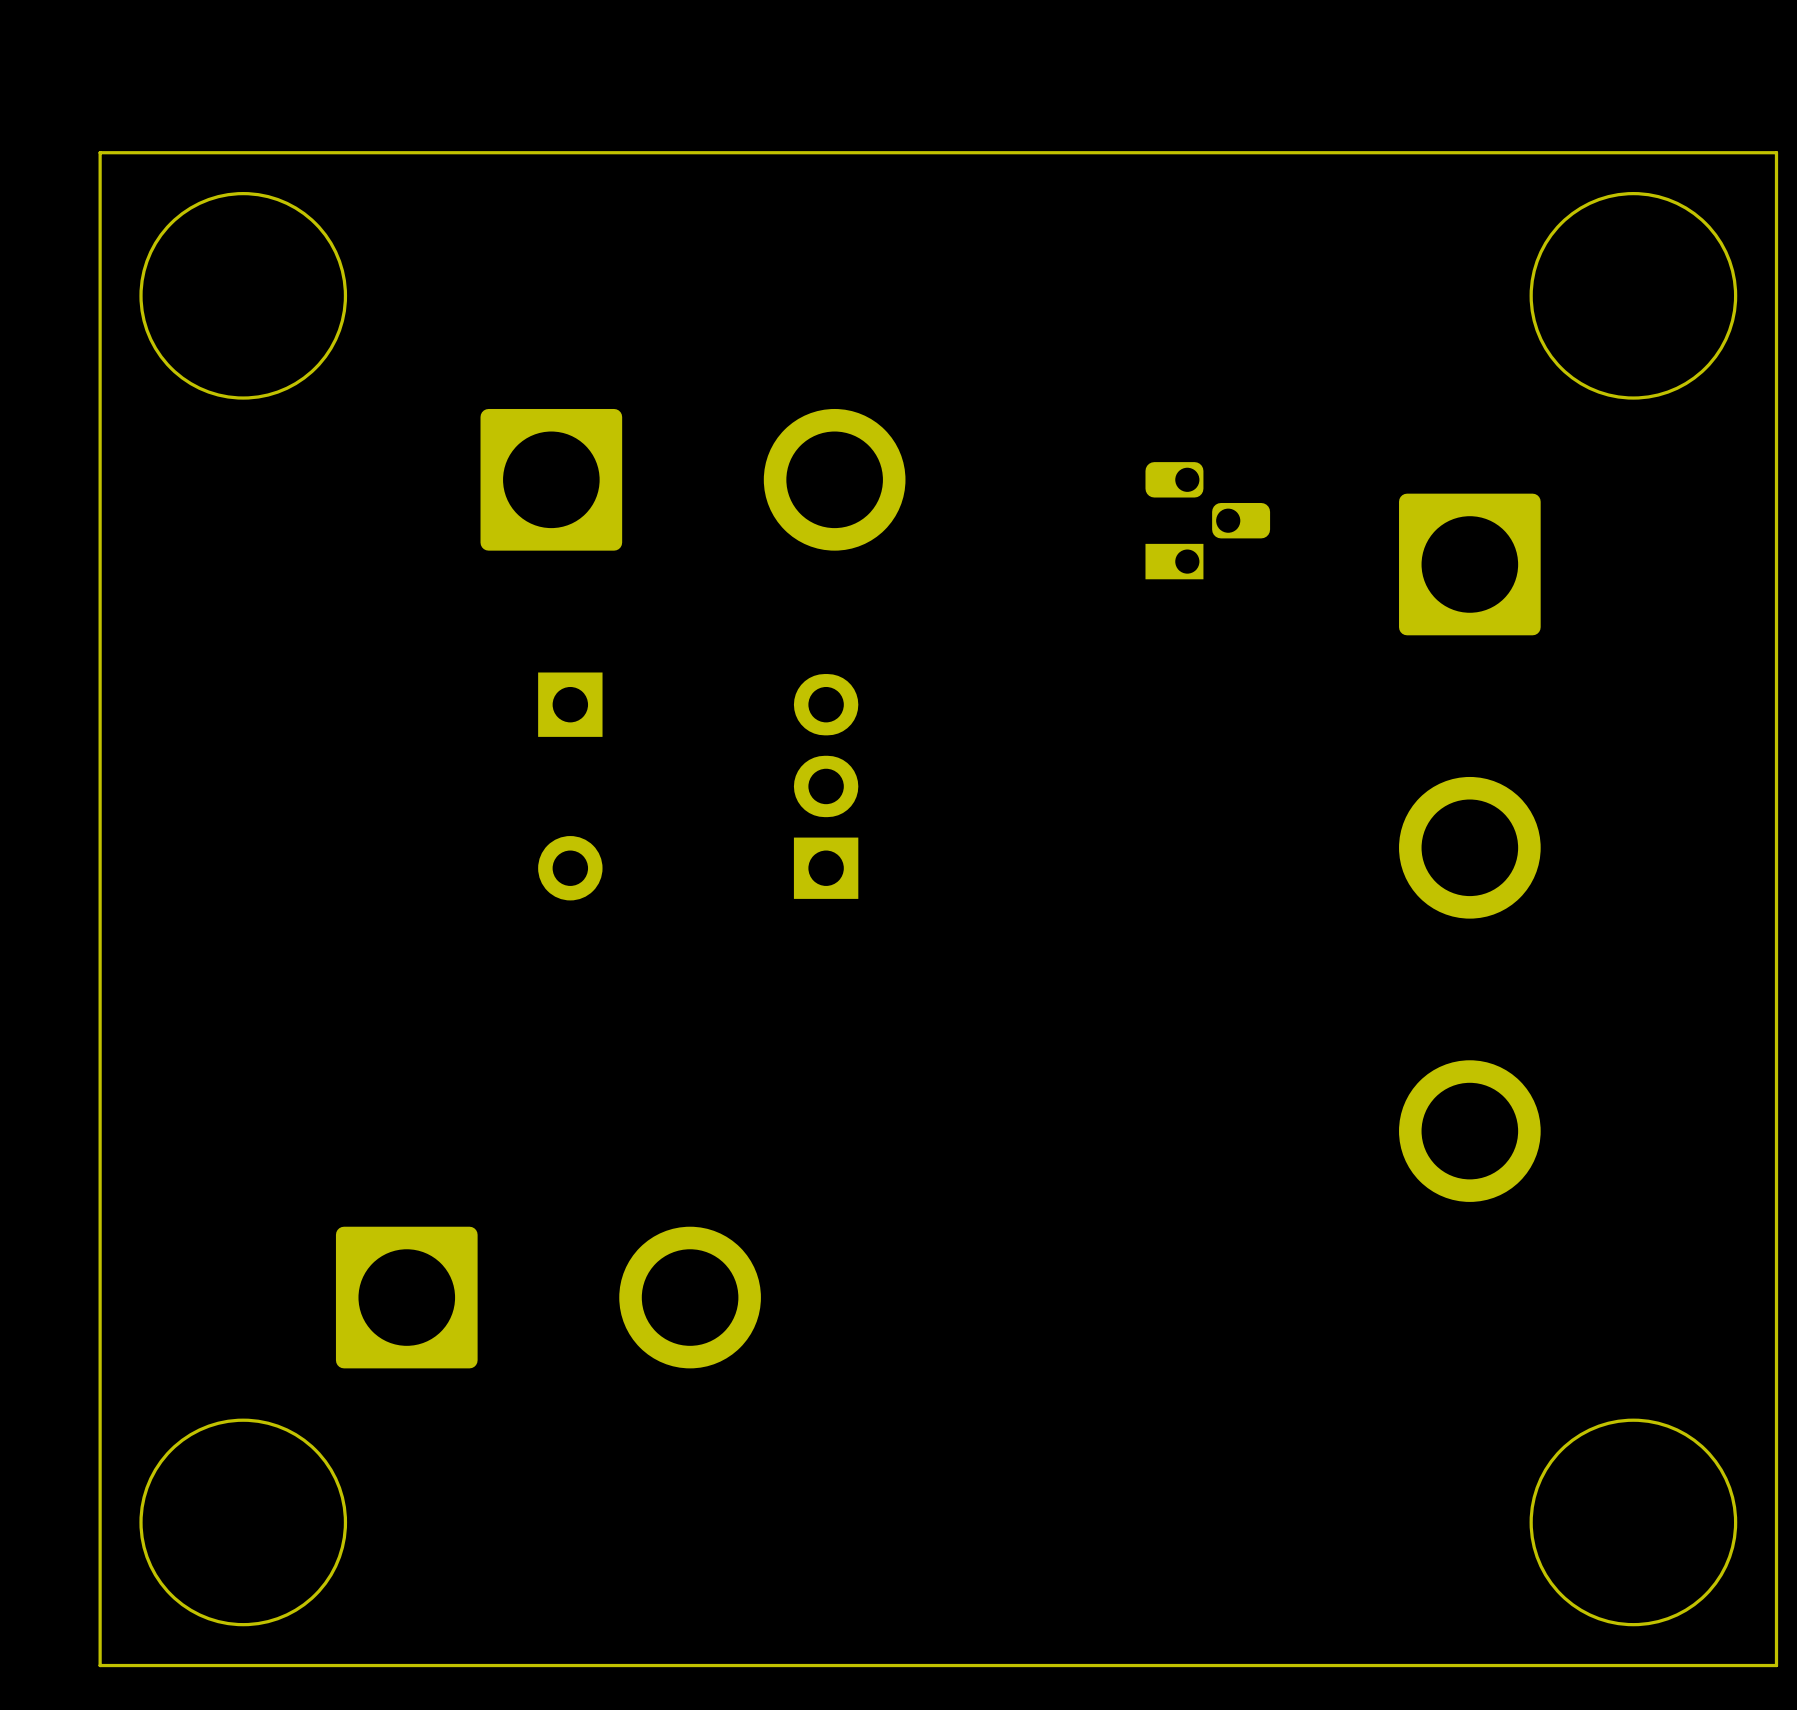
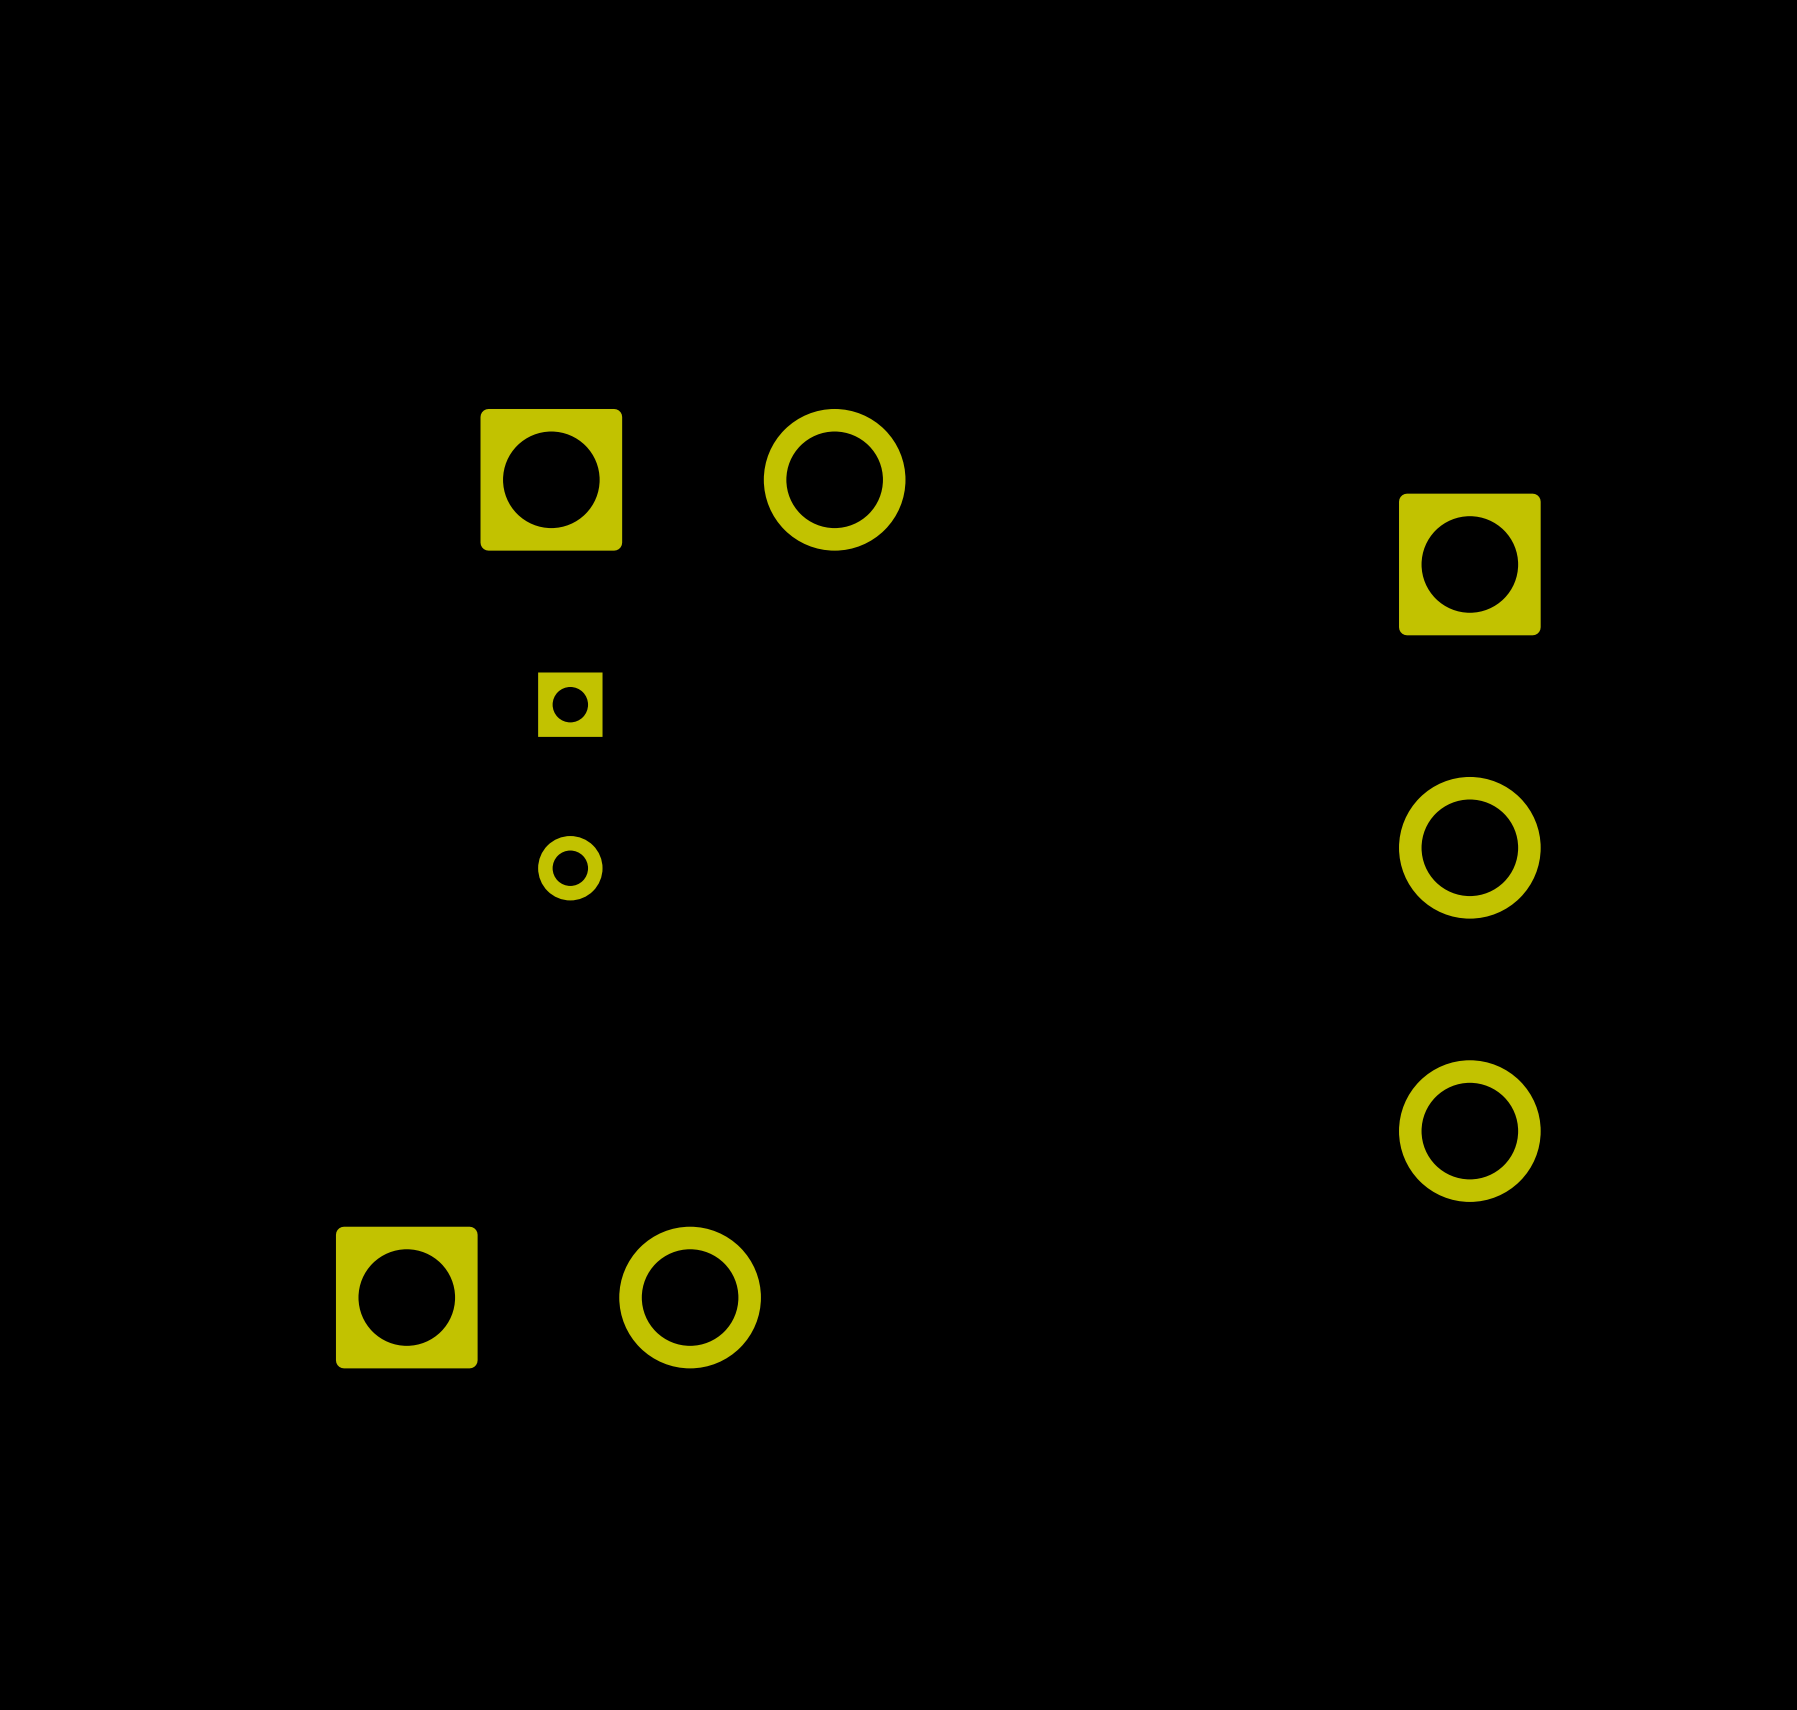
board edge: (1776, 152) (100, 152) (100, 1665) (1776, 1665) (1776, 152) -> none
round board edge: [139, 191, 348, 400] -> none
round board edge: [1529, 191, 1738, 400] -> none
part: (1207, 520) -> none
part: (826, 786) -> none
round board edge: [139, 1418, 348, 1627] -> none
round board edge: [1529, 1418, 1738, 1627] -> none

